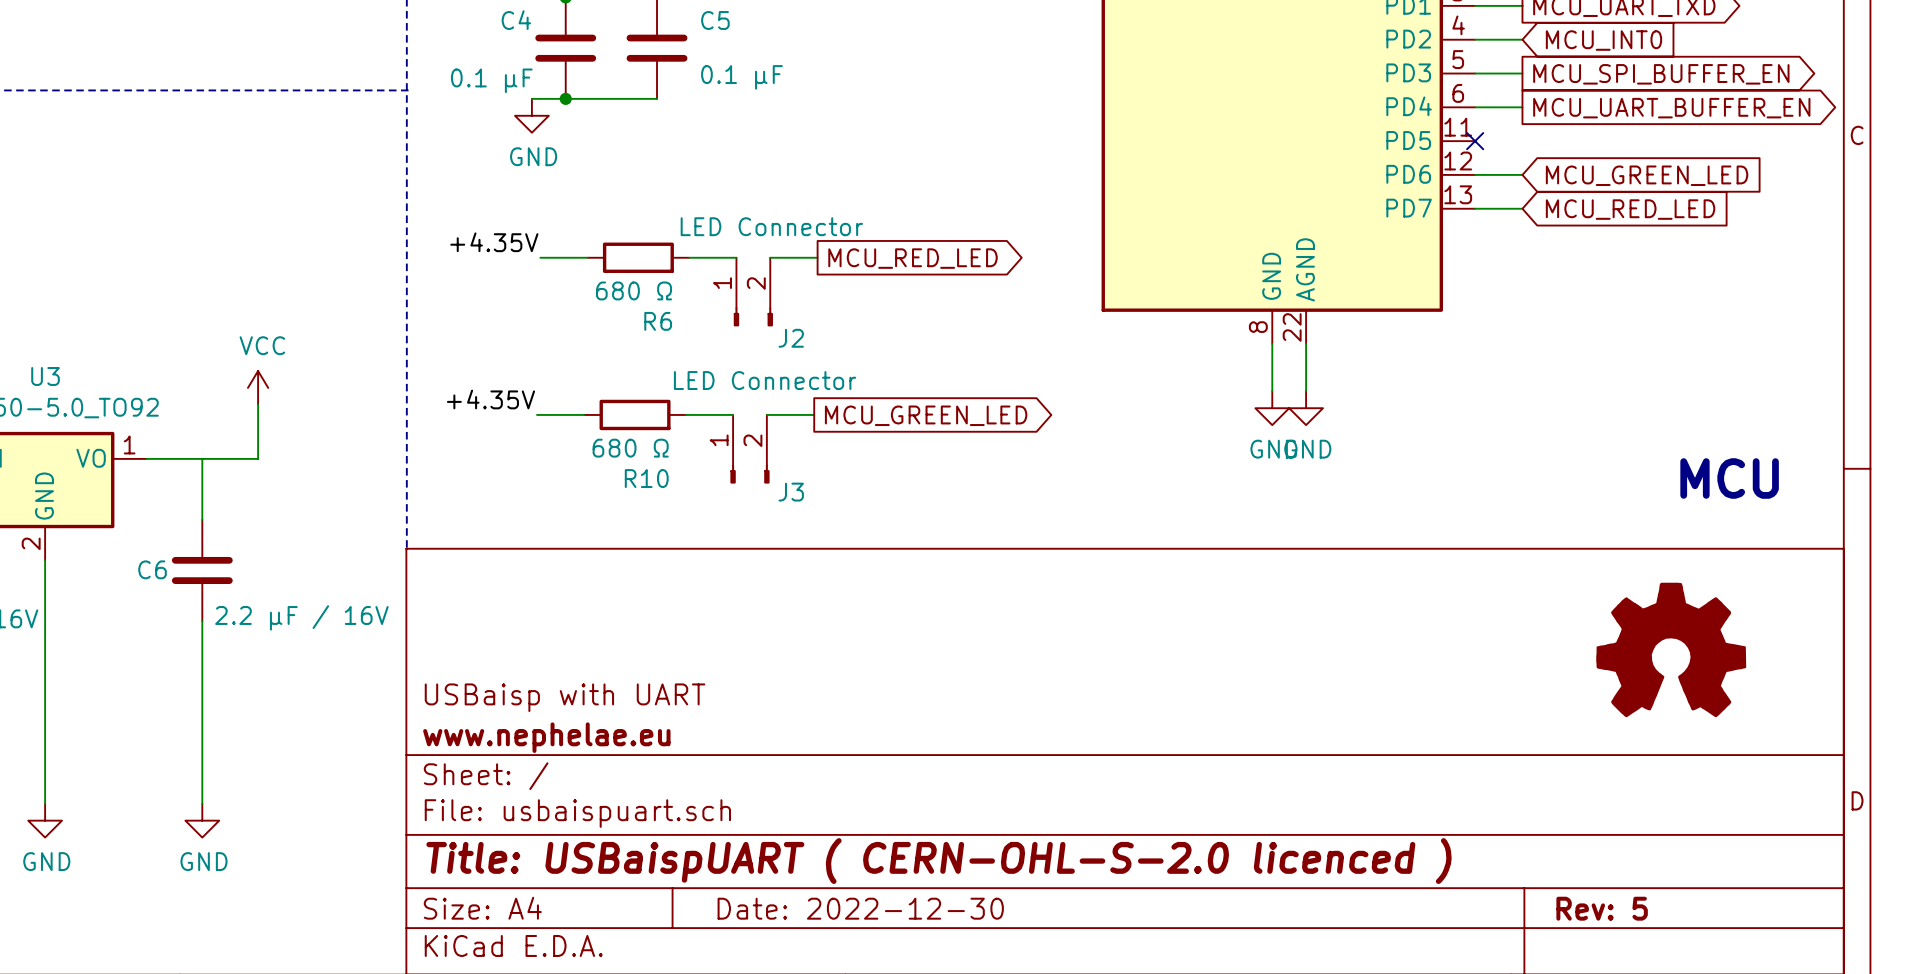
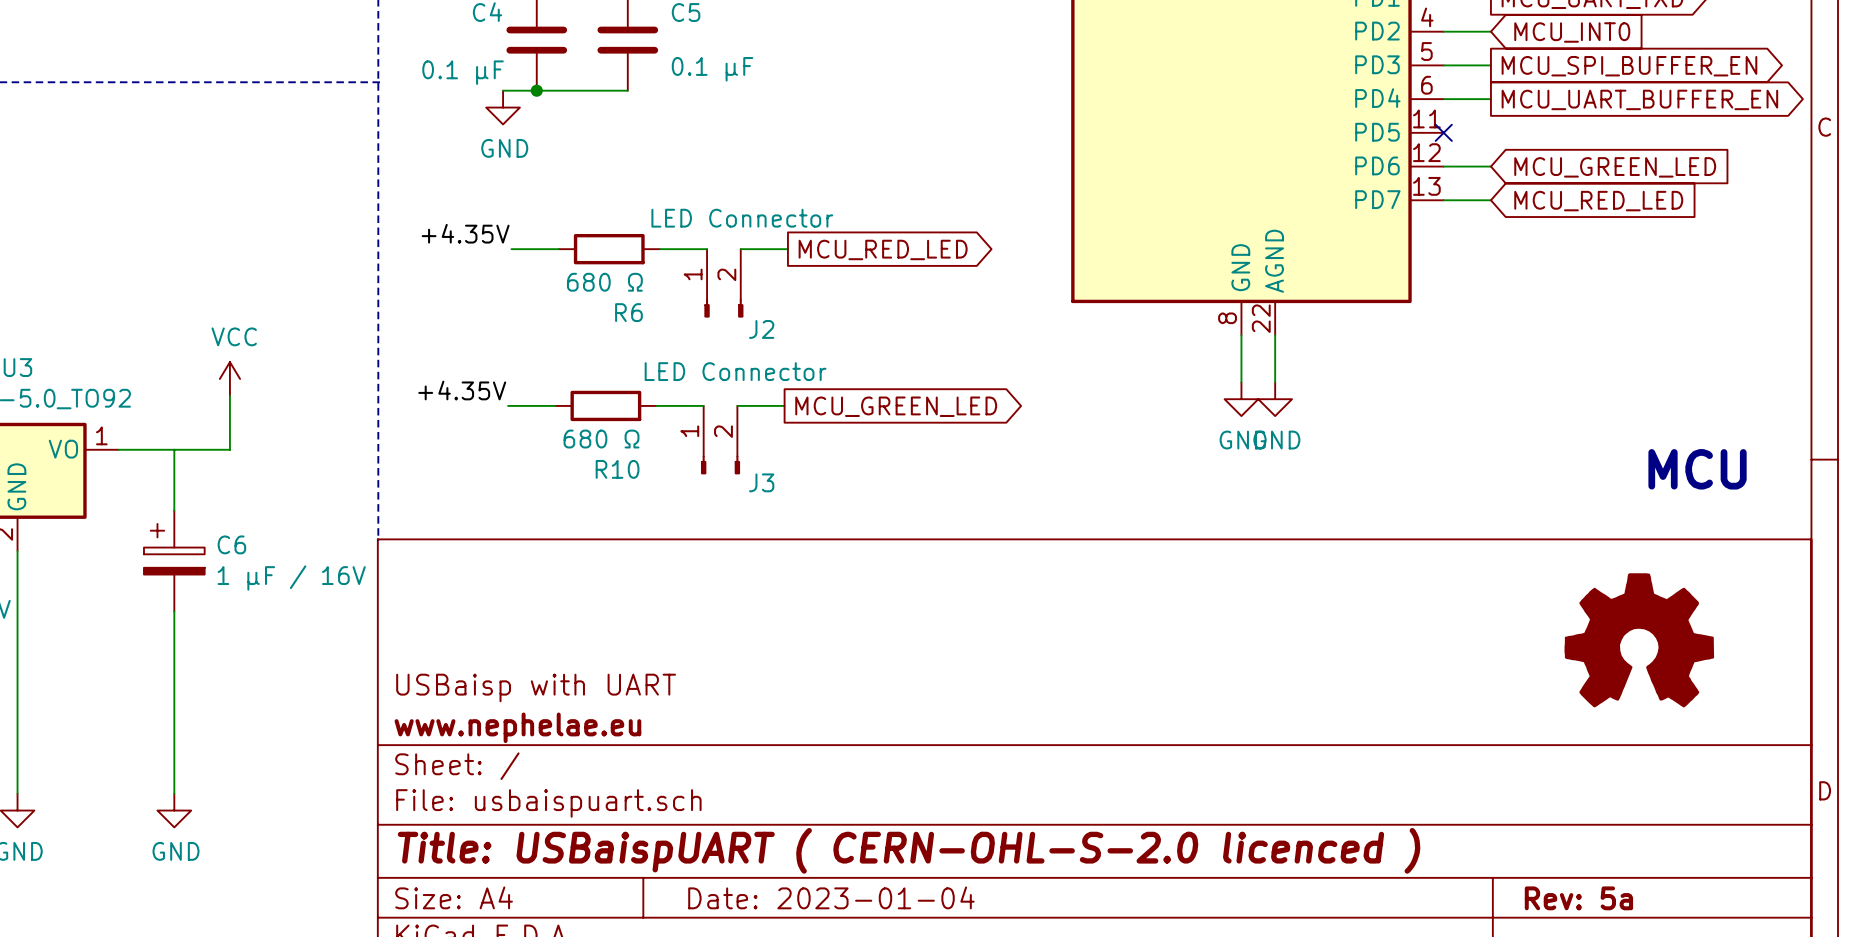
C6 symbol: [171, 519, 233, 622] -> [143, 510, 205, 612]
C6 name position: C6 (152, 569) -> C6 (231, 544)
C6 value: 2.2 μF / 16V (301, 617) -> 1 μF / 16V (291, 577)
title block: Date: 2022-12-30 (860, 908) -> Date: 2023-01-04 (831, 897)
title block: Rev: 5 (1602, 908) -> Rev: 5a (1578, 898)

